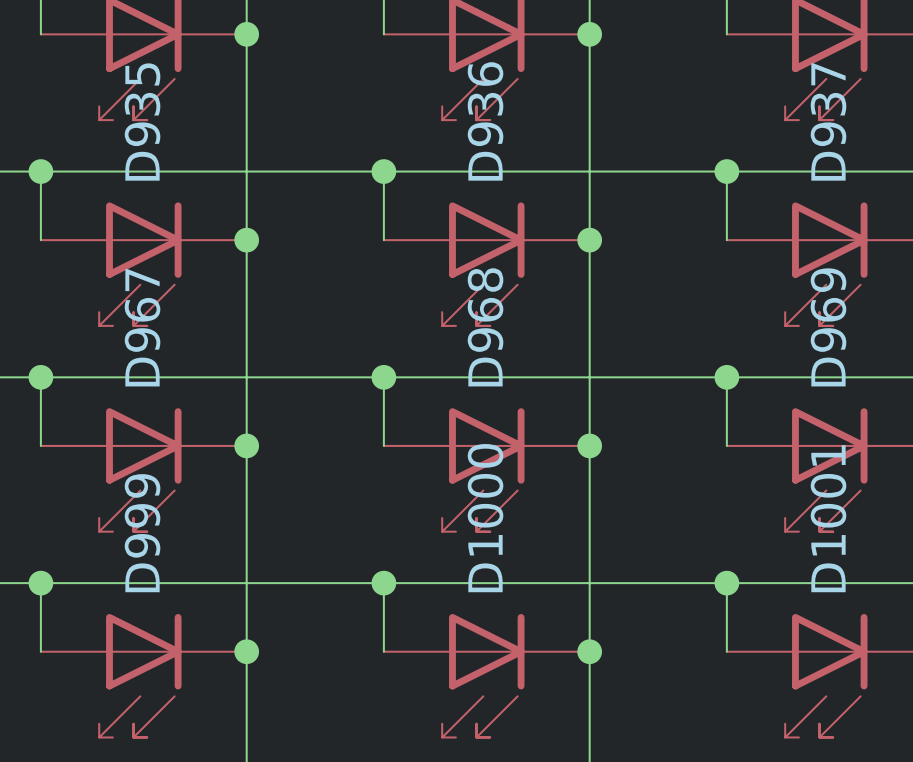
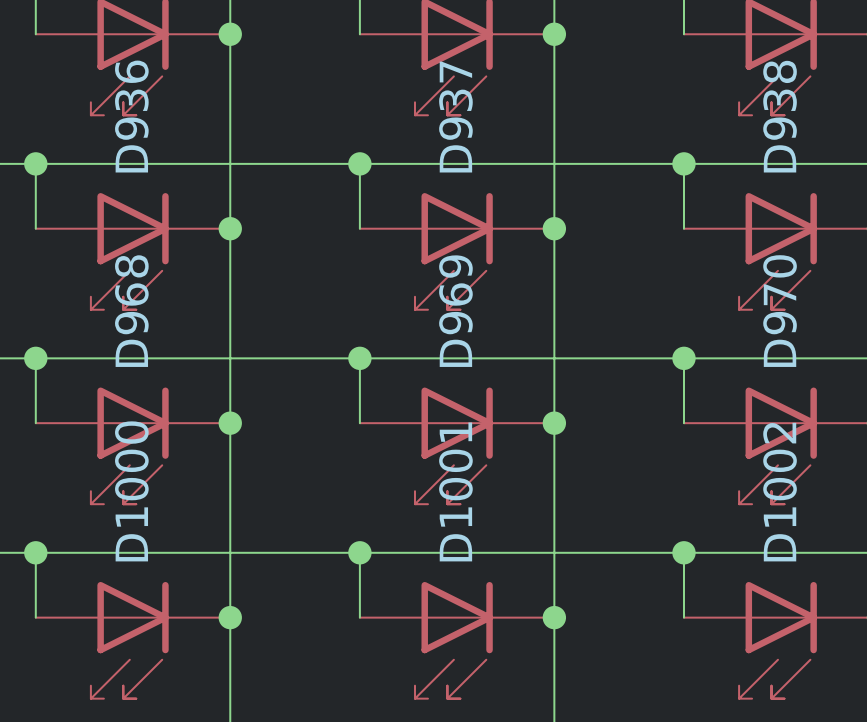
D936 name: D936 (485, 121) -> D937 (455, 117)
D937 name: D937 (828, 121) -> D938 (780, 116)
D935 name: D935 (142, 122) -> D936 (131, 116)
D967 name: D967 (142, 327) -> D968 (131, 311)
D968 name: D968 (485, 327) -> D969 (455, 311)
D969 name: D969 (828, 327) -> D970 (780, 311)
D1000 name: D1000 (485, 518) -> D1001 (455, 491)
D1001 name: D1001 (828, 518) -> D1002 (780, 492)
D999 name: D999 (142, 533) -> D1000 (131, 491)

